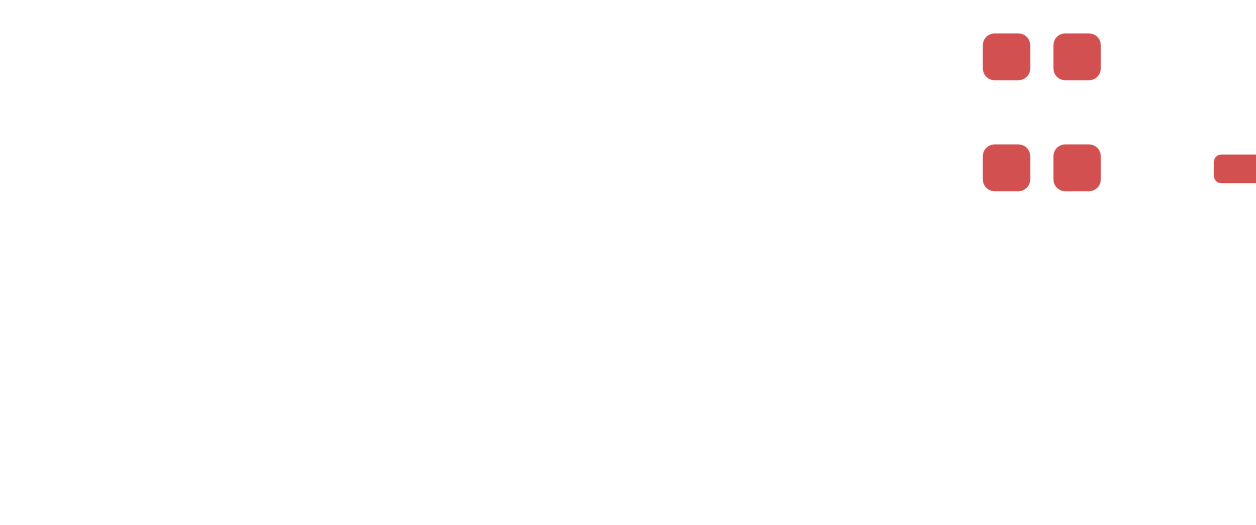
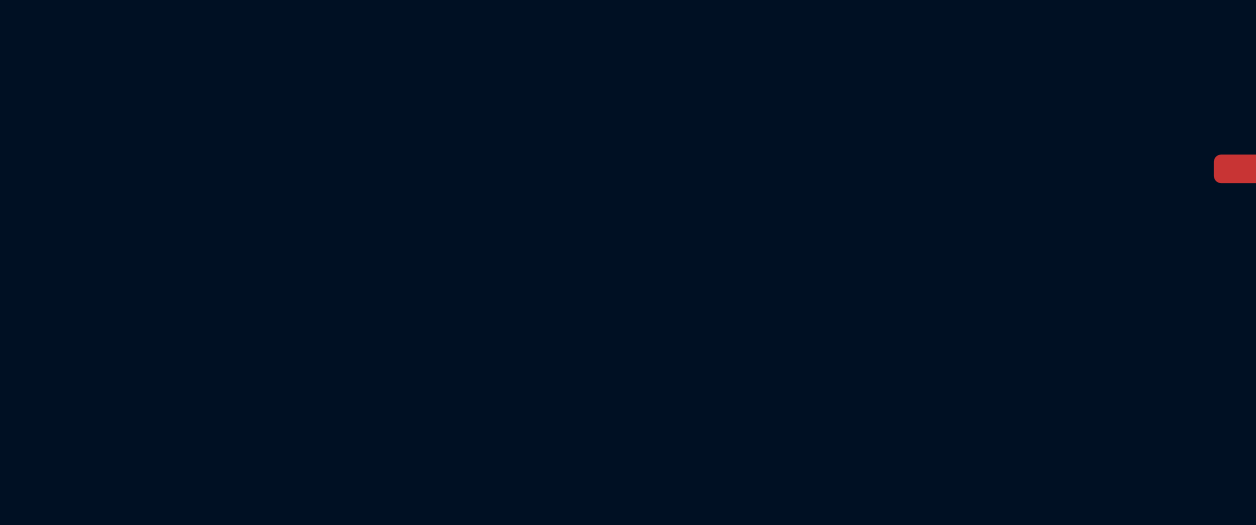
part: (1041, 56) -> none
part: (1041, 167) -> none

